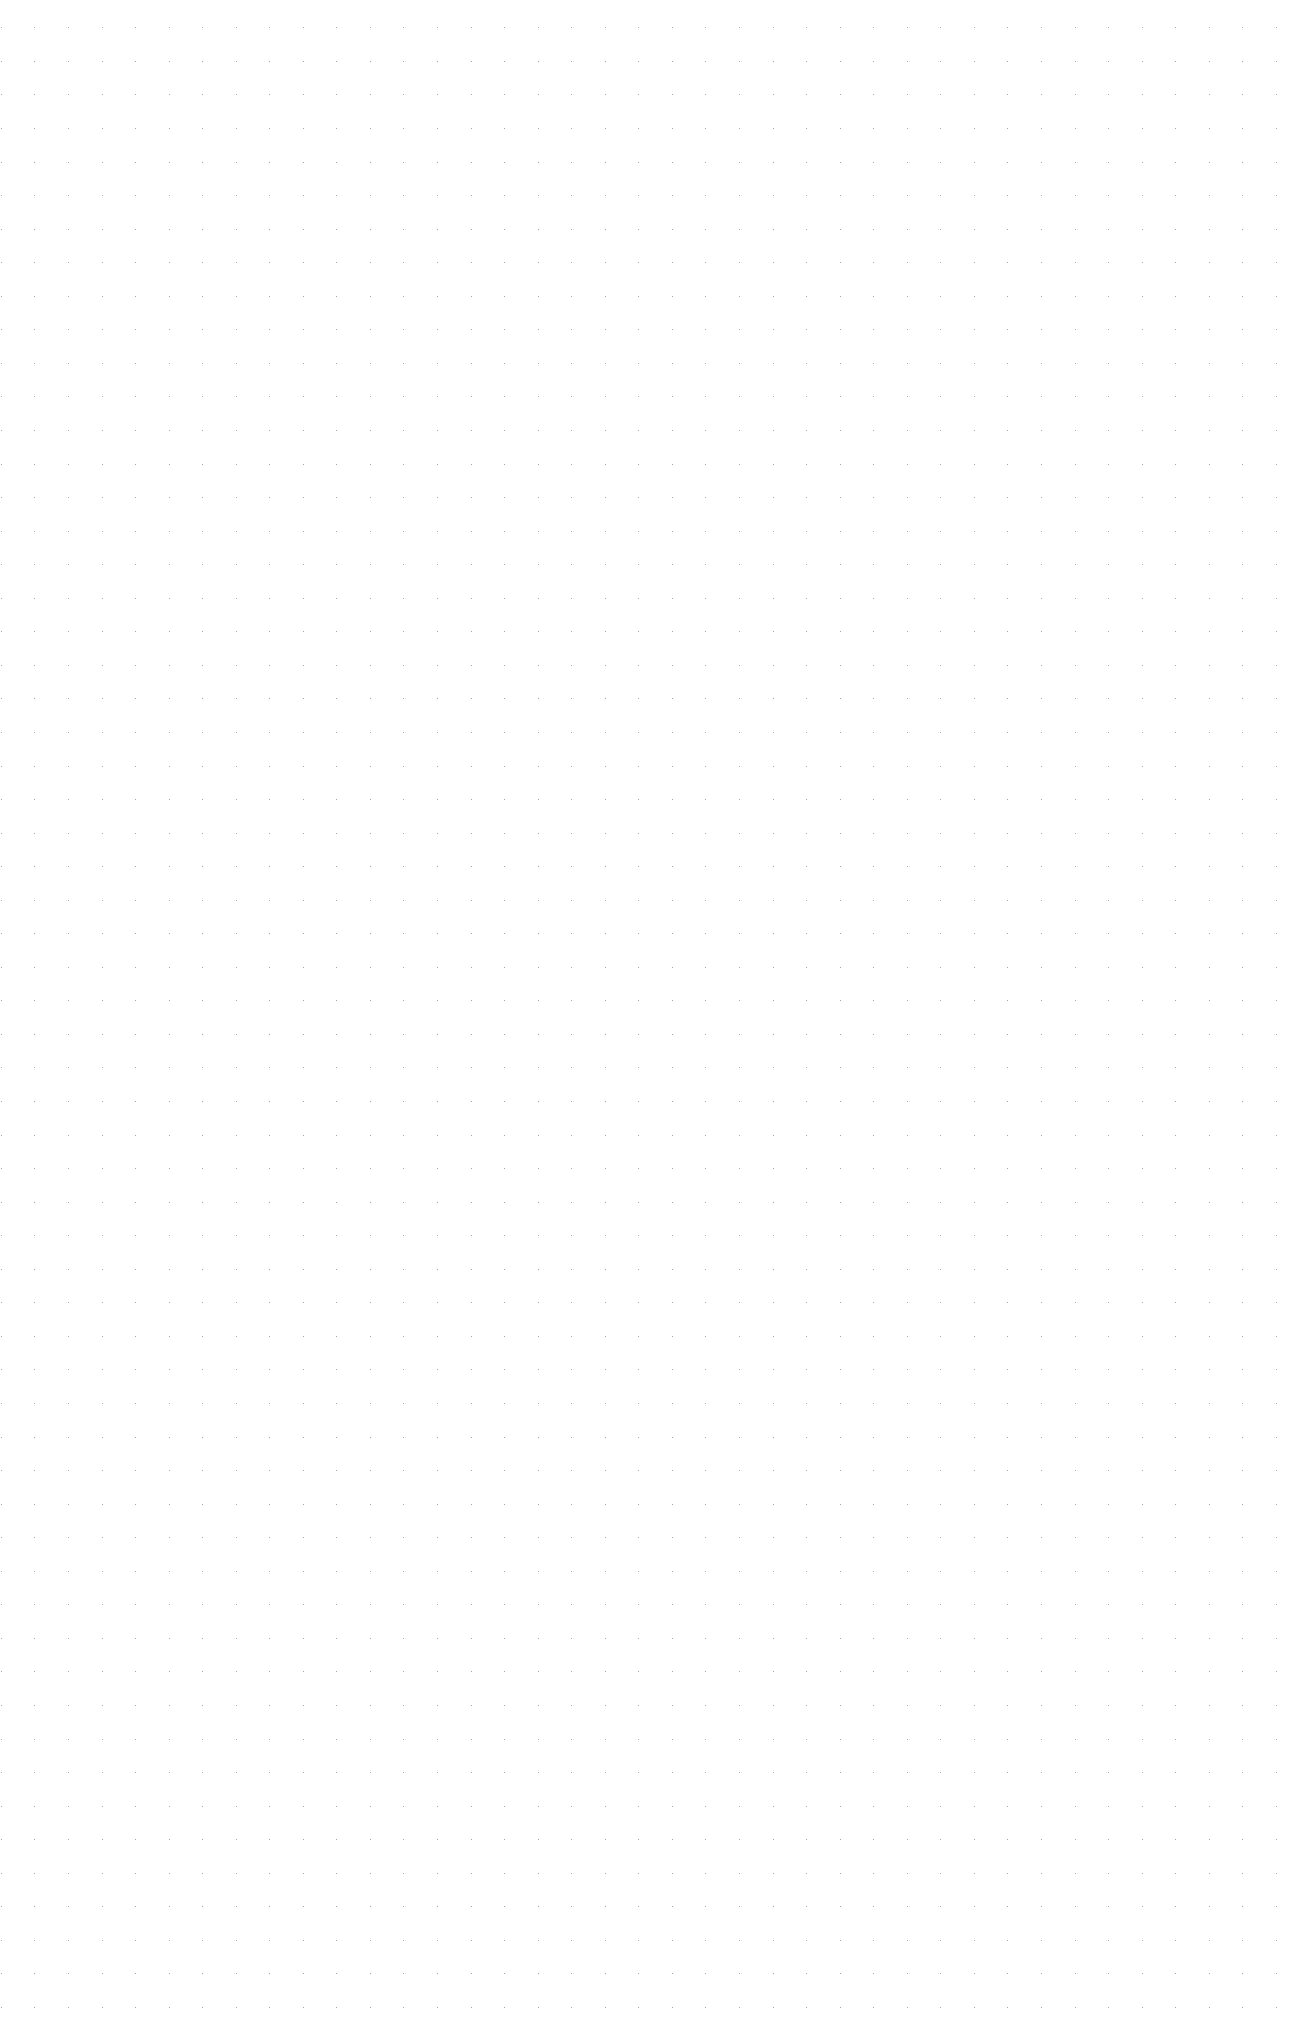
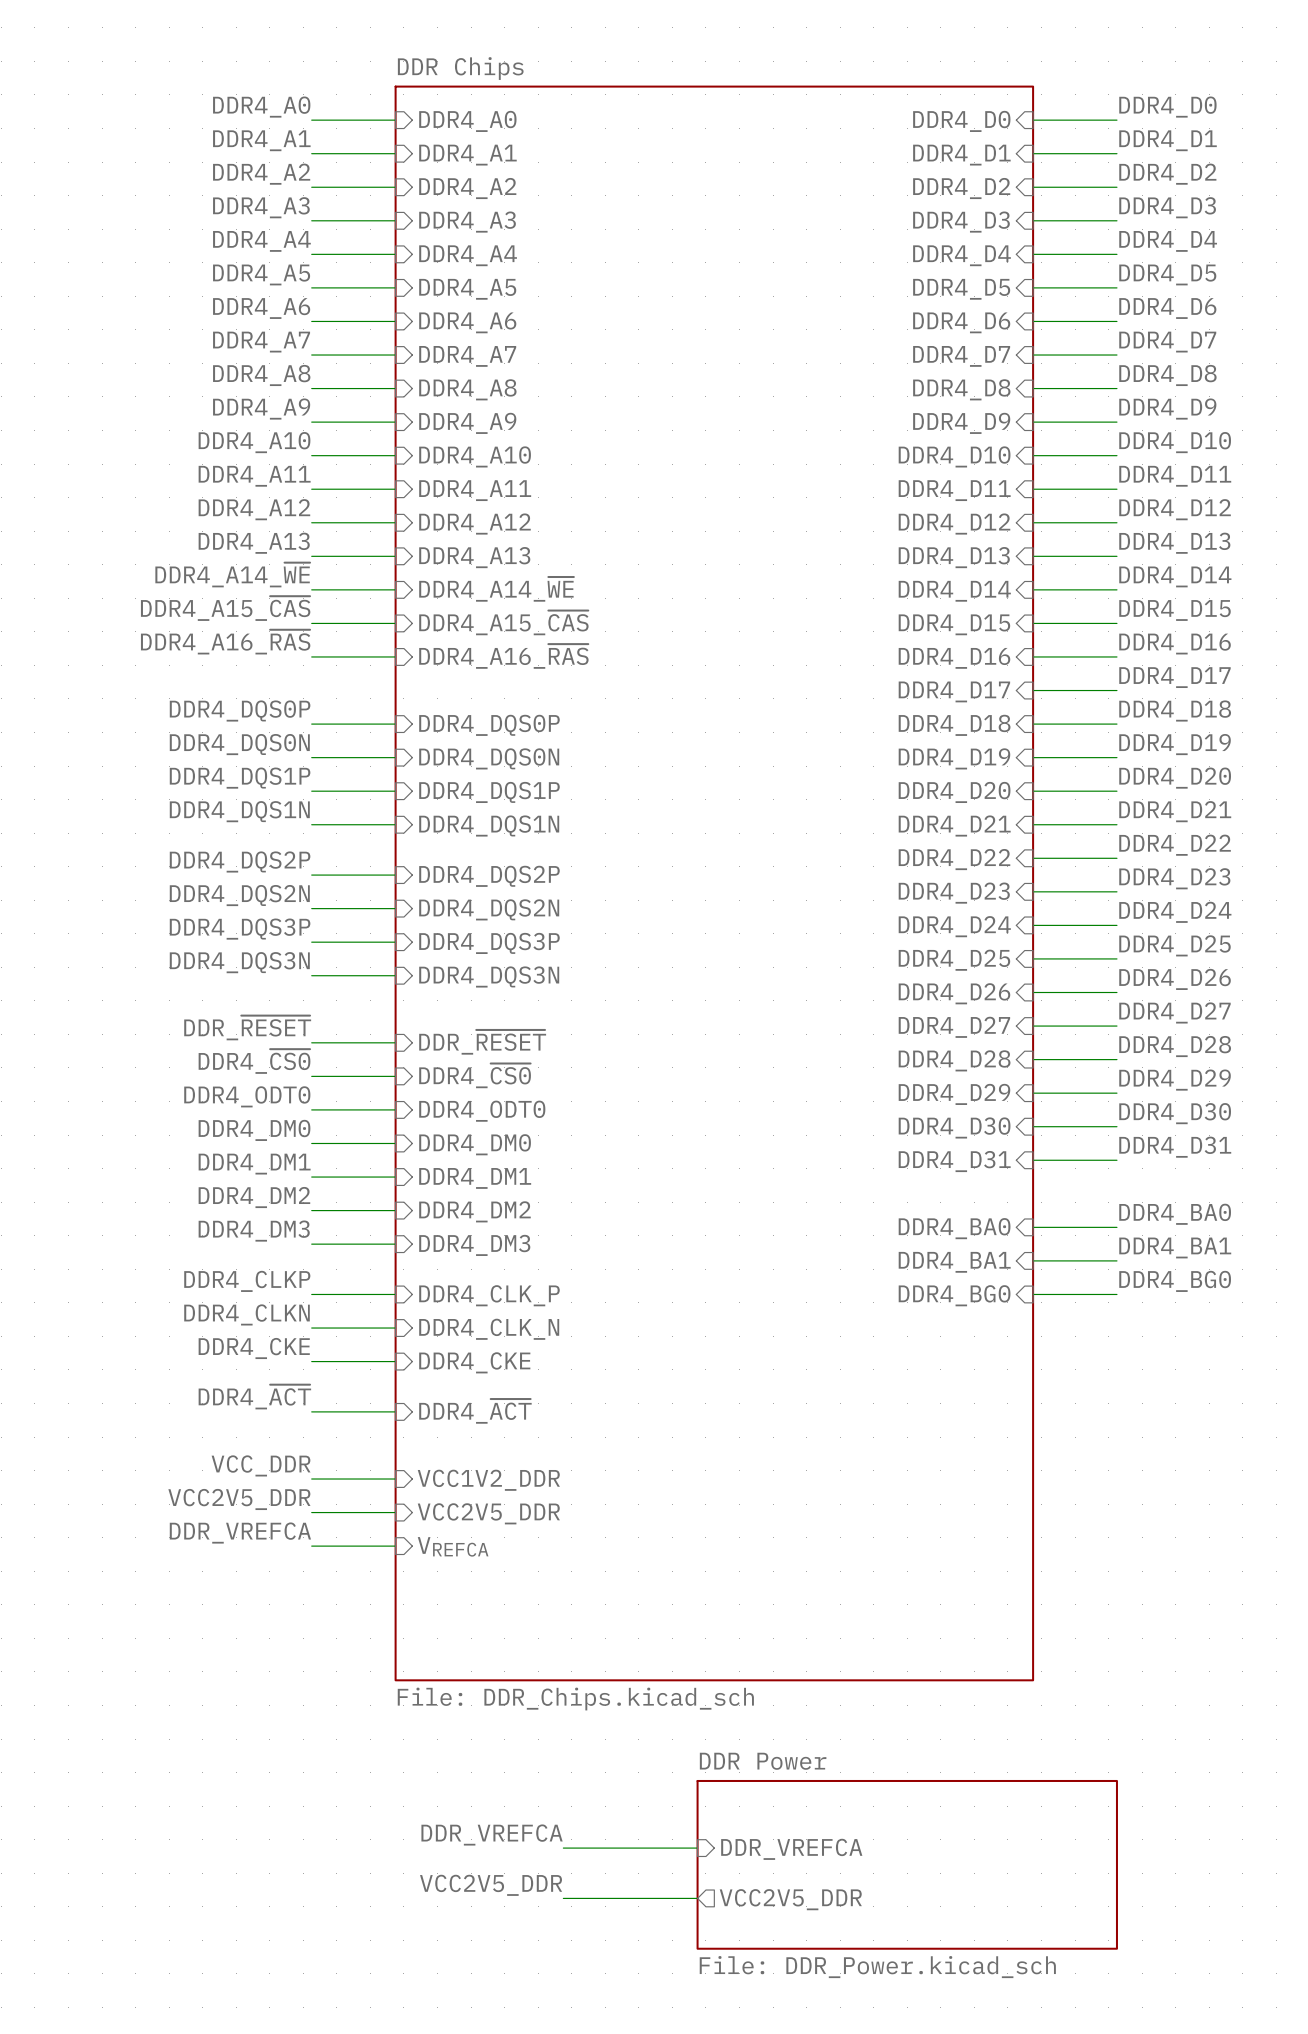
label: none -> DDR4_A0 (261, 107)
label: none -> DDR4_D0 (1167, 107)
wire: none -> (311, 120) (395, 120)
wire: none -> (1033, 120) (1116, 120)
sheet pin: none -> DDR4_A0 (467, 121)
sheet pin: none -> DDR4_D0 (961, 121)
label: none -> DDR4_A1 (261, 140)
label: none -> DDR4_D1 (1168, 140)
wire: none -> (311, 153) (395, 153)
wire: none -> (1033, 153) (1116, 153)
sheet pin: none -> DDR4_A1 (467, 155)
sheet pin: none -> DDR4_D1 (961, 155)
label: none -> DDR4_A2 (261, 174)
label: none -> DDR4_D2 (1167, 174)
wire: none -> (311, 187) (395, 187)
wire: none -> (1033, 187) (1116, 187)
sheet pin: none -> DDR4_A2 (467, 188)
sheet pin: none -> DDR4_D2 (961, 188)
label: none -> DDR4_A3 (261, 207)
label: none -> DDR4_D3 (1167, 207)
wire: none -> (311, 220) (395, 220)
wire: none -> (1033, 220) (1116, 220)
sheet pin: none -> DDR4_A3 (467, 222)
sheet pin: none -> DDR4_D3 (961, 222)
label: none -> DDR4_A4 (261, 241)
label: none -> DDR4_D4 (1168, 241)
wire: none -> (311, 254) (395, 254)
wire: none -> (1033, 254) (1116, 254)
sheet pin: none -> DDR4_A4 (468, 255)
sheet pin: none -> DDR4_D4 (962, 255)
label: none -> DDR4_A5 (261, 274)
label: none -> DDR4_D5 (1167, 274)
wire: none -> (311, 287) (395, 287)
wire: none -> (1033, 287) (1116, 287)
sheet pin: none -> DDR4_A5 (467, 289)
sheet pin: none -> DDR4_D5 (961, 289)
label: none -> DDR4_A6 (261, 308)
label: none -> DDR4_D6 (1167, 308)
wire: none -> (311, 321) (395, 321)
wire: none -> (1033, 321) (1116, 321)
sheet pin: none -> DDR4_A6 (467, 322)
sheet pin: none -> DDR4_D6 (961, 322)
label: none -> DDR4_A7 (261, 342)
label: none -> DDR4_D7 (1167, 342)
wire: none -> (311, 355) (395, 355)
wire: none -> (1033, 355) (1116, 355)
sheet pin: none -> DDR4_A7 (467, 356)
sheet pin: none -> DDR4_D7 (961, 356)
label: none -> DDR4_A8 (261, 375)
label: none -> DDR4_D8 (1167, 375)
wire: none -> (311, 388) (395, 388)
wire: none -> (1033, 388) (1116, 388)
sheet pin: none -> DDR4_A8 (467, 389)
sheet pin: none -> DDR4_D8 (961, 389)
label: none -> DDR4_A9 (261, 409)
label: none -> DDR4_D9 (1167, 409)
wire: none -> (311, 422) (395, 422)
wire: none -> (1033, 422) (1116, 422)
sheet pin: none -> DDR4_A9 (467, 423)
sheet pin: none -> DDR4_D9 (961, 423)
label: none -> DDR4_A10 (254, 442)
label: none -> DDR4_D10 (1175, 442)
wire: none -> (311, 455) (395, 455)
wire: none -> (1033, 455) (1116, 455)
sheet pin: none -> DDR4_A10 (475, 456)
sheet pin: none -> DDR4_D10 (954, 456)
label: none -> DDR4_A11 (254, 476)
label: none -> DDR4_D11 (1175, 476)
wire: none -> (311, 489) (395, 489)
wire: none -> (1033, 489) (1116, 489)
sheet pin: none -> DDR4_A11 (475, 490)
sheet pin: none -> DDR4_D11 (954, 490)
label: none -> DDR4_A12 (254, 509)
label: none -> DDR4_D12 (1175, 509)
wire: none -> (311, 522) (395, 522)
wire: none -> (1033, 522) (1116, 522)
sheet pin: none -> DDR4_A12 (474, 524)
sheet pin: none -> DDR4_D12 (954, 524)
label: none -> DDR4_A13 (254, 543)
label: none -> DDR4_D13 (1174, 543)
wire: none -> (311, 556) (395, 556)
wire: none -> (1033, 556) (1116, 556)
sheet pin: none -> DDR4_A13 (474, 557)
sheet pin: none -> DDR4_D13 (954, 557)
label: none -> DDR4_A14_~{WE} (232, 575)
label: none -> DDR4_D14 (1175, 576)
wire: none -> (311, 589) (395, 589)
sheet pin: none -> DDR4_A14_~{WE} (496, 589)
wire: none -> (1033, 589) (1116, 589)
sheet pin: none -> DDR4_D14 (954, 591)
label: none -> DDR4_A15_~{CAS} (225, 608)
label: none -> DDR4_D15 (1174, 610)
sheet pin: none -> DDR4_A15_~{CAS} (503, 622)
wire: none -> (311, 623) (395, 623)
wire: none -> (1033, 623) (1116, 623)
sheet pin: none -> DDR4_D15 (954, 624)
label: none -> DDR4_A16_~{RAS} (225, 642)
label: none -> DDR4_D16 (1175, 644)
wire: none -> (311, 656) (395, 656)
sheet pin: none -> DDR4_A16_~{RAS} (503, 656)
wire: none -> (1033, 656) (1116, 656)
sheet pin: none -> DDR4_D16 (954, 658)
label: none -> DDR4_D17 (1174, 677)
wire: none -> (1033, 690) (1116, 690)
sheet pin: none -> DDR4_D17 (954, 691)
label: none -> DDR4_DQS0P (240, 711)
label: none -> DDR4_D18 (1175, 711)
wire: none -> (311, 724) (395, 724)
wire: none -> (1033, 724) (1116, 724)
sheet pin: none -> DDR4_DQS0P (489, 725)
sheet pin: none -> DDR4_D18 (954, 725)
label: none -> DDR4_DQS0N (239, 744)
label: none -> DDR4_D19 (1175, 744)
wire: none -> (311, 757) (395, 757)
wire: none -> (1033, 757) (1116, 757)
sheet pin: none -> DDR4_DQS0N (489, 758)
sheet pin: none -> DDR4_D19 (954, 758)
label: none -> DDR4_DQS1P (240, 778)
label: none -> DDR4_D20 (1175, 778)
wire: none -> (311, 791) (395, 791)
wire: none -> (1033, 791) (1116, 791)
sheet pin: none -> DDR4_DQS1P (489, 792)
sheet pin: none -> DDR4_D20 (954, 792)
label: none -> DDR4_DQS1N (239, 811)
label: none -> DDR4_D21 (1175, 811)
wire: none -> (311, 824) (395, 824)
wire: none -> (1033, 824) (1116, 824)
sheet pin: none -> DDR4_DQS1N (489, 826)
sheet pin: none -> DDR4_D21 (954, 826)
label: none -> DDR4_D22 (1175, 845)
wire: none -> (1033, 858) (1116, 858)
sheet pin: none -> DDR4_D22 (954, 859)
label: none -> DDR4_DQS2P (240, 861)
wire: none -> (311, 875) (395, 875)
sheet pin: none -> DDR4_DQS2P (489, 876)
label: none -> DDR4_D23 (1174, 878)
sheet DDR Chips: none -> File: DDR_Chips.kicad_sch (714, 883)
wire: none -> (1033, 891) (1116, 891)
sheet pin: none -> DDR4_D23 (954, 893)
label: none -> DDR4_DQS2N (239, 895)
wire: none -> (311, 908) (395, 908)
sheet pin: none -> DDR4_DQS2N (489, 909)
label: none -> DDR4_D24 (1175, 912)
wire: none -> (1033, 925) (1116, 925)
sheet pin: none -> DDR4_D24 (954, 926)
label: none -> DDR4_DQS3P (240, 929)
wire: none -> (311, 942) (395, 942)
sheet pin: none -> DDR4_DQS3P (489, 943)
label: none -> DDR4_D25 (1174, 945)
wire: none -> (1033, 958) (1116, 958)
sheet pin: none -> DDR4_D25 (954, 960)
label: none -> DDR4_DQS3N (239, 962)
wire: none -> (311, 975) (395, 975)
sheet pin: none -> DDR4_DQS3N (489, 976)
label: none -> DDR4_D26 (1175, 979)
wire: none -> (1033, 992) (1116, 992)
sheet pin: none -> DDR4_D26 (954, 993)
label: none -> DDR4_D27 (1174, 1012)
wire: none -> (1033, 1026) (1116, 1026)
label: none -> DDR_~{RESET} (247, 1027)
sheet pin: none -> DDR4_D27 (954, 1027)
wire: none -> (311, 1042) (395, 1042)
sheet pin: none -> DDR_~{RESET} (482, 1042)
label: none -> DDR4_D28 (1175, 1046)
wire: none -> (1033, 1059) (1116, 1059)
sheet pin: none -> DDR4_D28 (954, 1060)
label: none -> DDR4_~{CS0} (254, 1061)
sheet pin: none -> DDR4_~{CS0} (475, 1075)
wire: none -> (311, 1076) (395, 1076)
label: none -> DDR4_D29 (1175, 1080)
wire: none -> (1033, 1093) (1116, 1093)
sheet pin: none -> DDR4_D29 (954, 1094)
label: none -> DDR4_ODT0 (247, 1096)
wire: none -> (311, 1109) (395, 1109)
sheet pin: none -> DDR4_ODT0 (482, 1111)
label: none -> DDR4_D30 (1175, 1113)
wire: none -> (1033, 1126) (1116, 1126)
sheet pin: none -> DDR4_D30 (954, 1127)
label: none -> DDR4_DM0 (254, 1130)
wire: none -> (311, 1143) (395, 1143)
sheet pin: none -> DDR4_DM0 (475, 1144)
label: none -> DDR4_D31 (1175, 1147)
wire: none -> (1033, 1160) (1116, 1160)
sheet pin: none -> DDR4_D31 (954, 1161)
label: none -> DDR4_DM1 (254, 1164)
wire: none -> (311, 1177) (395, 1177)
sheet pin: none -> DDR4_DM1 (475, 1178)
label: none -> DDR4_DM2 (254, 1197)
wire: none -> (311, 1210) (395, 1210)
sheet pin: none -> DDR4_DM2 (474, 1211)
label: none -> DDR4_BA0 (1175, 1214)
wire: none -> (1033, 1227) (1116, 1227)
sheet pin: none -> DDR4_BA0 (954, 1228)
label: none -> DDR4_DM3 (254, 1231)
wire: none -> (311, 1244) (395, 1244)
sheet pin: none -> DDR4_DM3 (474, 1245)
label: none -> DDR4_BA1 (1175, 1247)
wire: none -> (1033, 1260) (1116, 1260)
sheet pin: none -> DDR4_BA1 (954, 1262)
label: none -> DDR4_CLKP (247, 1281)
label: none -> DDR4_BG0 (1175, 1281)
wire: none -> (311, 1294) (395, 1294)
wire: none -> (1033, 1294) (1116, 1294)
sheet pin: none -> DDR4_CLK_P (489, 1295)
sheet pin: none -> DDR4_BG0 (954, 1295)
label: none -> DDR4_CLKN (247, 1314)
wire: none -> (311, 1328) (395, 1328)
sheet pin: none -> DDR4_CLK_N (489, 1329)
label: none -> DDR4_CKE (254, 1348)
wire: none -> (311, 1361) (395, 1361)
sheet pin: none -> DDR4_CKE (474, 1362)
label: none -> DDR4_~{ACT} (254, 1397)
wire: none -> (311, 1411) (395, 1411)
sheet pin: none -> DDR4_~{ACT} (475, 1411)
label: none -> VCC_DDR (261, 1465)
wire: none -> (311, 1479) (395, 1479)
sheet pin: none -> VCC1V2_DDR (488, 1480)
label: none -> VCC2V5_DDR (239, 1499)
wire: none -> (311, 1512) (395, 1512)
sheet pin: none -> VCC2V5_DDR (488, 1513)
label: none -> DDR_VREFCA (240, 1533)
wire: none -> (311, 1546) (395, 1546)
sheet pin: none -> VREFCA (453, 1546)
label: none -> DDR_VREFCA (492, 1834)
wire: none -> (563, 1848) (697, 1848)
sheet pin: none -> DDR_VREFCA (791, 1849)
sheet DDR Power: none -> File: DDR_Power.kicad_sch (907, 1864)
label: none -> VCC2V5_DDR (491, 1885)
wire: none -> (563, 1898) (697, 1898)
sheet pin: none -> VCC2V5_DDR (790, 1899)

